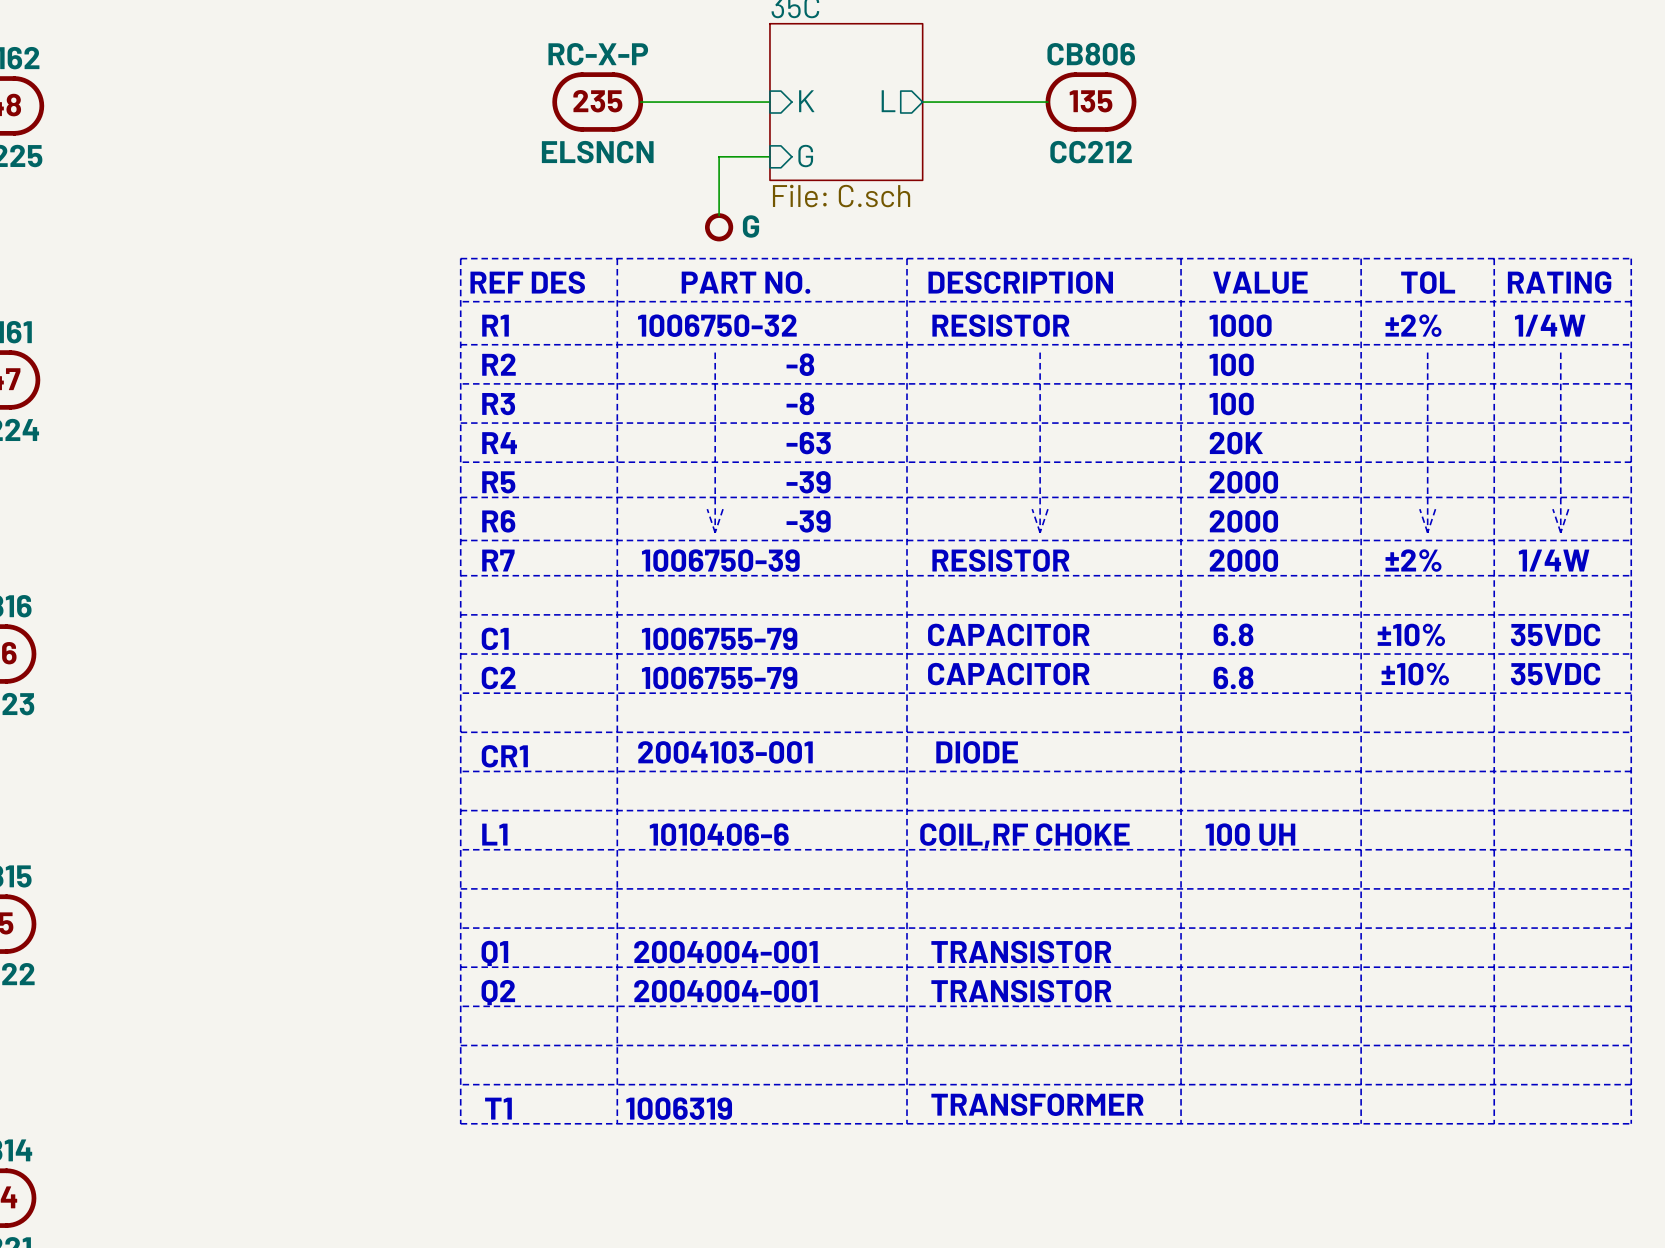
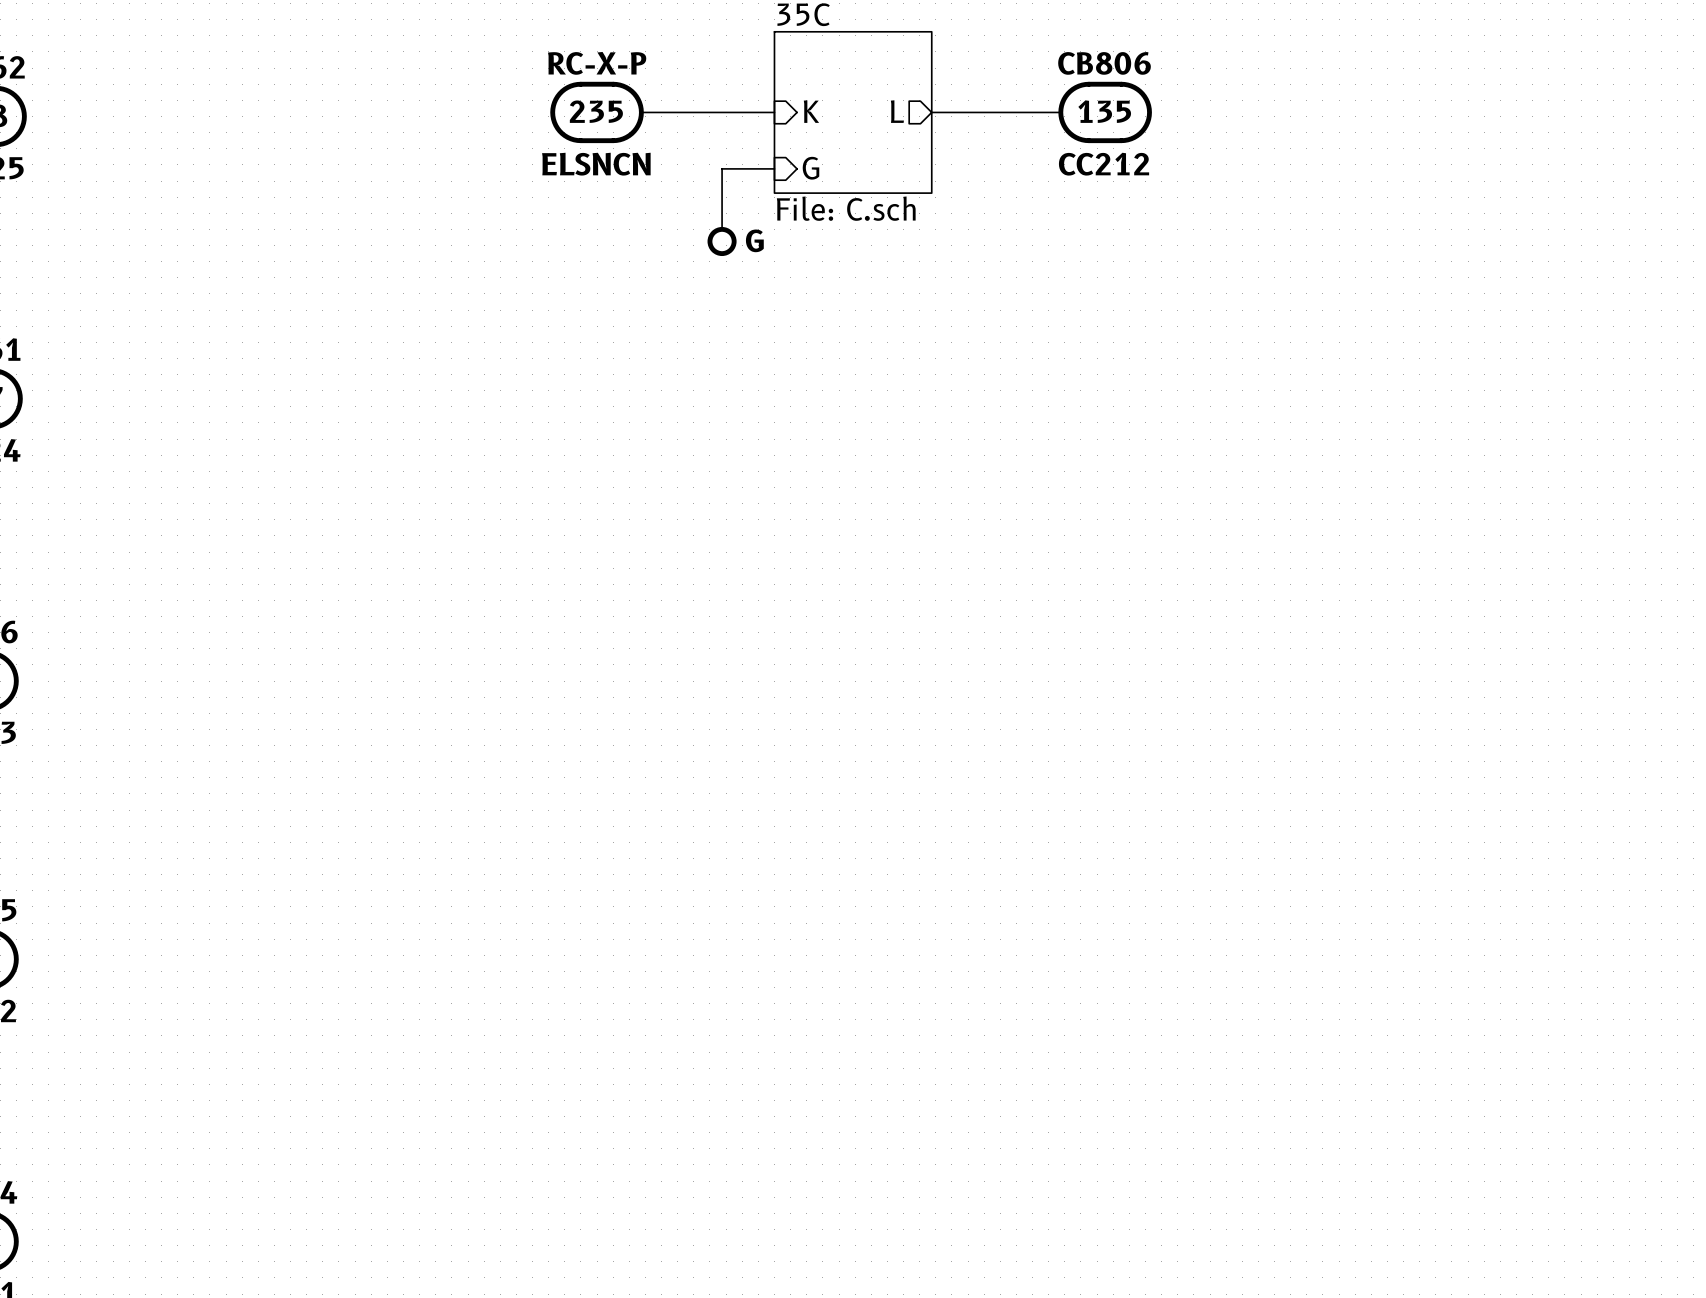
line: (460, 258) (1631, 258) (1631, 1123) (460, 1123) (460, 258) -> none
line: (617, 258) (617, 1123) -> none
line: (907, 258) (907, 1123) -> none
line: (1181, 258) (1181, 1123) -> none
line: (1361, 258) (1361, 1123) -> none
line: (1494, 258) (1494, 1123) -> none
text: REF DES (527, 282) -> none
text: PART NO. (746, 282) -> none
text: DESCRIPTION (1020, 282) -> none
text: VALUE (1260, 282) -> none
text: TOL (1428, 282) -> none
text: RATING (1559, 282) -> none
line: (460, 301) (1631, 301) -> none
text: R1 (495, 325) -> none
text: 1006750-32 (717, 325) -> none
text: RESISTOR (1000, 325) -> none
text: 1000 (1240, 325) -> none
text: ±2% (1413, 325) -> none
text: 1/4W (1550, 325) -> none
line: (460, 344) (1631, 344) -> none
line: (715, 352) (715, 532) -> none
line: (1040, 352) (1040, 532) -> none
line: (1427, 352) (1427, 532) -> none
line: (1560, 352) (1560, 532) -> none
text: R2 (498, 364) -> none
text: -8 (800, 364) -> none
text: 100 (1231, 364) -> none
line: (460, 383) (1631, 383) -> none
text: -8 (800, 403) -> none
text: 100 (1231, 403) -> none
text: R3 (498, 404) -> none
line: (460, 423) (1631, 423) -> none
text: R4 (499, 443) -> none
text: -63 (808, 443) -> none
text: 20K (1236, 443) -> none
line: (460, 462) (1631, 462) -> none
text: R5 (498, 482) -> none
text: -39 (808, 482) -> none
text: 2000 (1243, 482) -> none
line: (460, 497) (1631, 497) -> none
line: (707, 509) (715, 532) -> none
line: (723, 509) (715, 532) -> none
line: (1032, 509) (1040, 532) -> none
line: (1047, 509) (1040, 532) -> none
line: (1419, 509) (1427, 532) -> none
line: (1435, 509) (1427, 532) -> none
line: (1552, 509) (1560, 532) -> none
line: (1568, 509) (1560, 532) -> none
text: R6 (498, 521) -> none
text: -39 (808, 521) -> none
text: 2000 (1243, 521) -> none
line: (460, 540) (1631, 540) -> none
text: R7 (498, 560) -> none
text: 1006750-39 (720, 560) -> none
text: RESISTOR (1000, 560) -> none
text: 2000 (1243, 560) -> none
text: ±2% (1413, 560) -> none
text: 1/4W (1554, 560) -> none
line: (460, 575) (1631, 575) -> none
line: (460, 614) (1631, 614) -> none
text: CAPACITOR (1008, 634) -> none
text: 6.8 (1233, 634) -> none
text: ±10% (1411, 634) -> none
text: 35VDC (1555, 634) -> none
text: C1 (495, 638) -> none
text: 1006755-79 (719, 638) -> none
line: (460, 654) (1631, 654) -> none
text: CAPACITOR (1008, 674) -> none
text: ±10% (1415, 674) -> none
text: 35VDC (1555, 674) -> none
text: C2 (498, 677) -> none
text: 6.8 (1233, 677) -> none
text: 1006755-79 (719, 678) -> none
line: (460, 693) (1631, 693) -> none
line: (460, 732) (1631, 732) -> none
text: 2004103-001 (725, 752) -> none
text: DIODE (977, 752) -> none
text: CR1 (504, 756) -> none
line: (460, 771) (1631, 771) -> none
line: (460, 810) (1631, 810) -> none
text: L1 (494, 834) -> none
text: 1010406-6 (719, 834) -> none
text: 100 UH (1250, 834) -> none
text: COIL,RF CHOKE (1024, 835) -> none
line: (460, 849) (1631, 849) -> none
line: (460, 888) (1631, 888) -> none
line: (460, 928) (1631, 928) -> none
text: 2004004-001 (725, 952) -> none
text: TRANSISTOR (1021, 952) -> none
text: Q1 (494, 953) -> none
line: (460, 967) (1631, 967) -> none
text: 2004004-001 (725, 991) -> none
text: TRANSISTOR (1021, 991) -> none
text: Q2 (498, 992) -> none
line: (460, 1006) (1631, 1006) -> none
line: (460, 1045) (1631, 1045) -> none
line: (460, 1084) (1631, 1084) -> none
text: TRANSFORMER (1037, 1104) -> none
text: T1 (498, 1108) -> none
text: 1006319 (679, 1108) -> none

